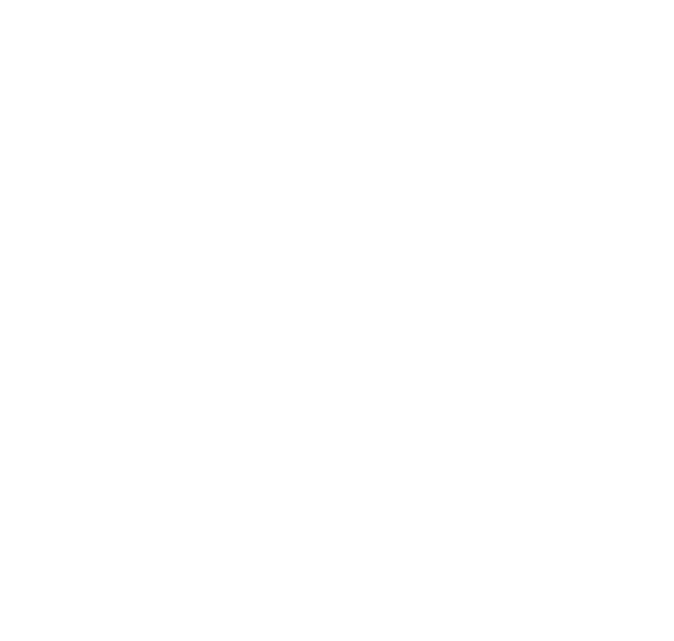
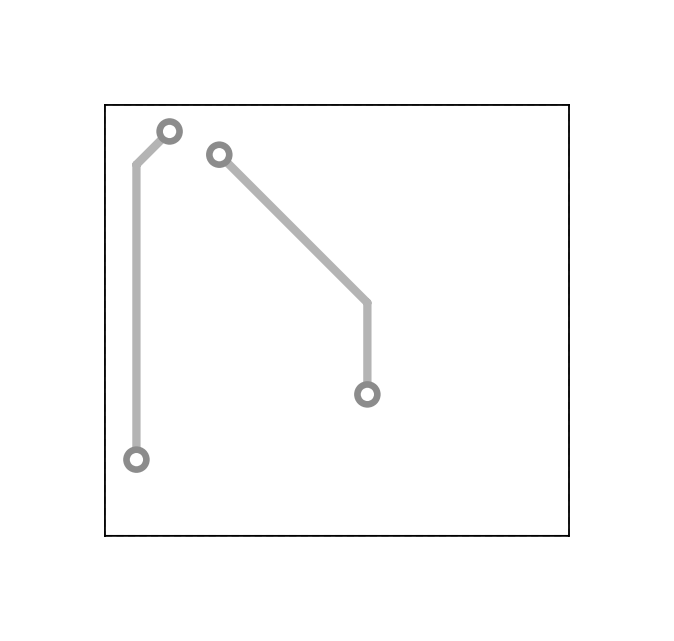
board edge: none -> (569, 104) (104, 104) (104, 535) (569, 535) (569, 104)
track: none -> (169, 131) (136, 164) (136, 459)
via: none -> (169, 131)
track: none -> (219, 154) (367, 302) (367, 394)
via: none -> (219, 154)
via: none -> (367, 394)
via: none -> (136, 459)

